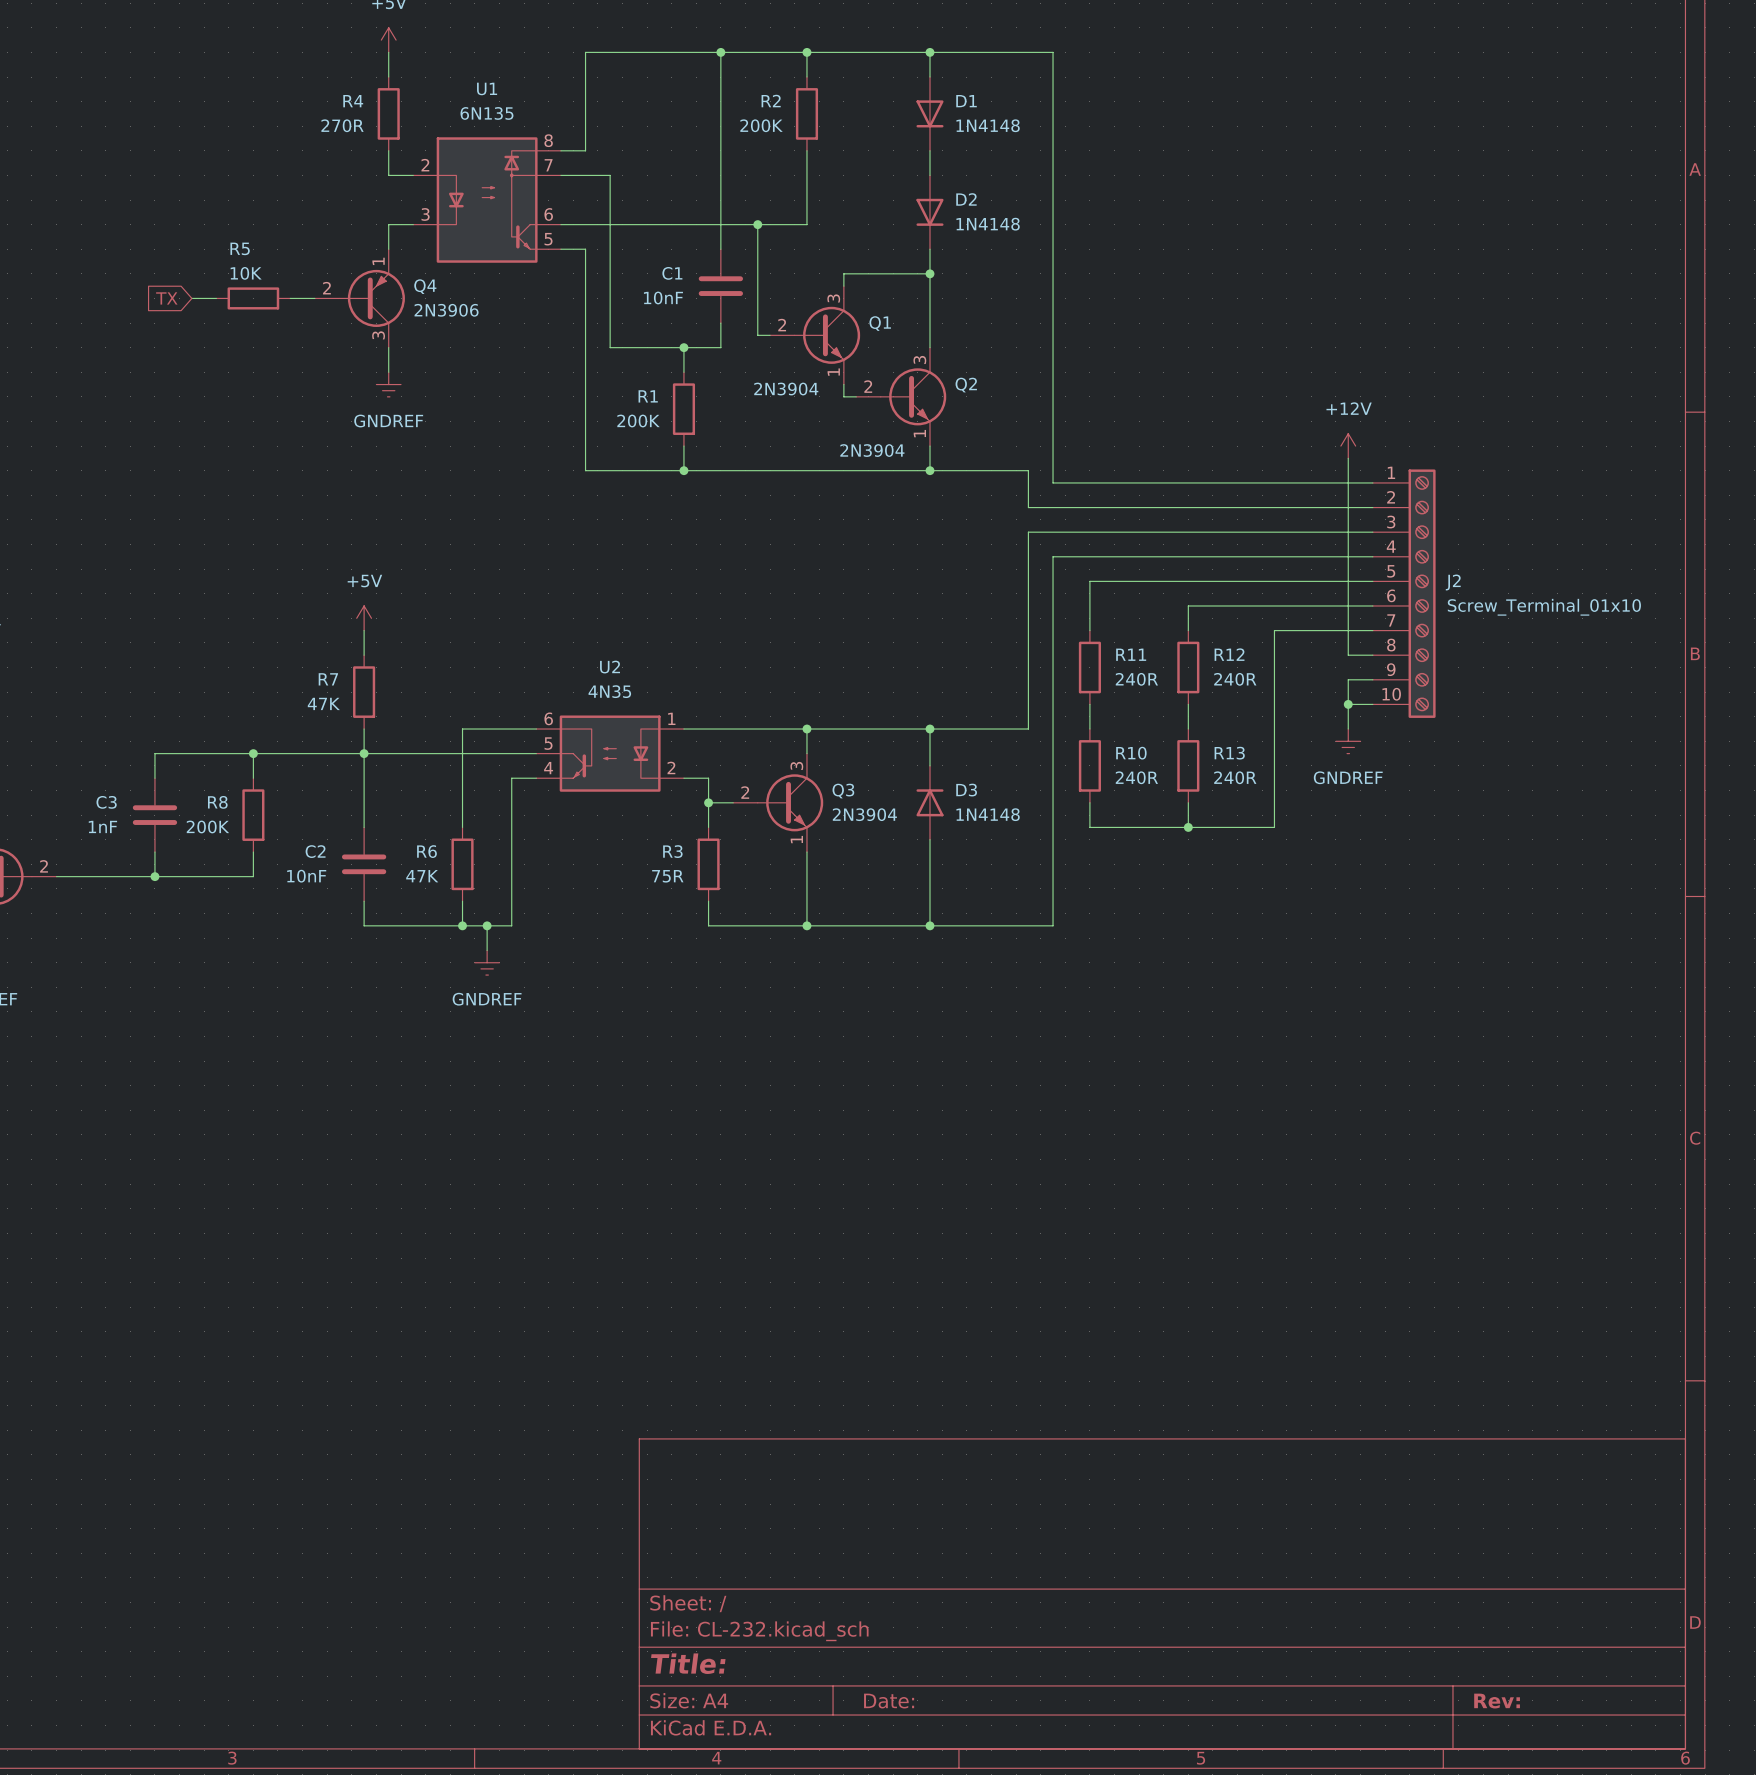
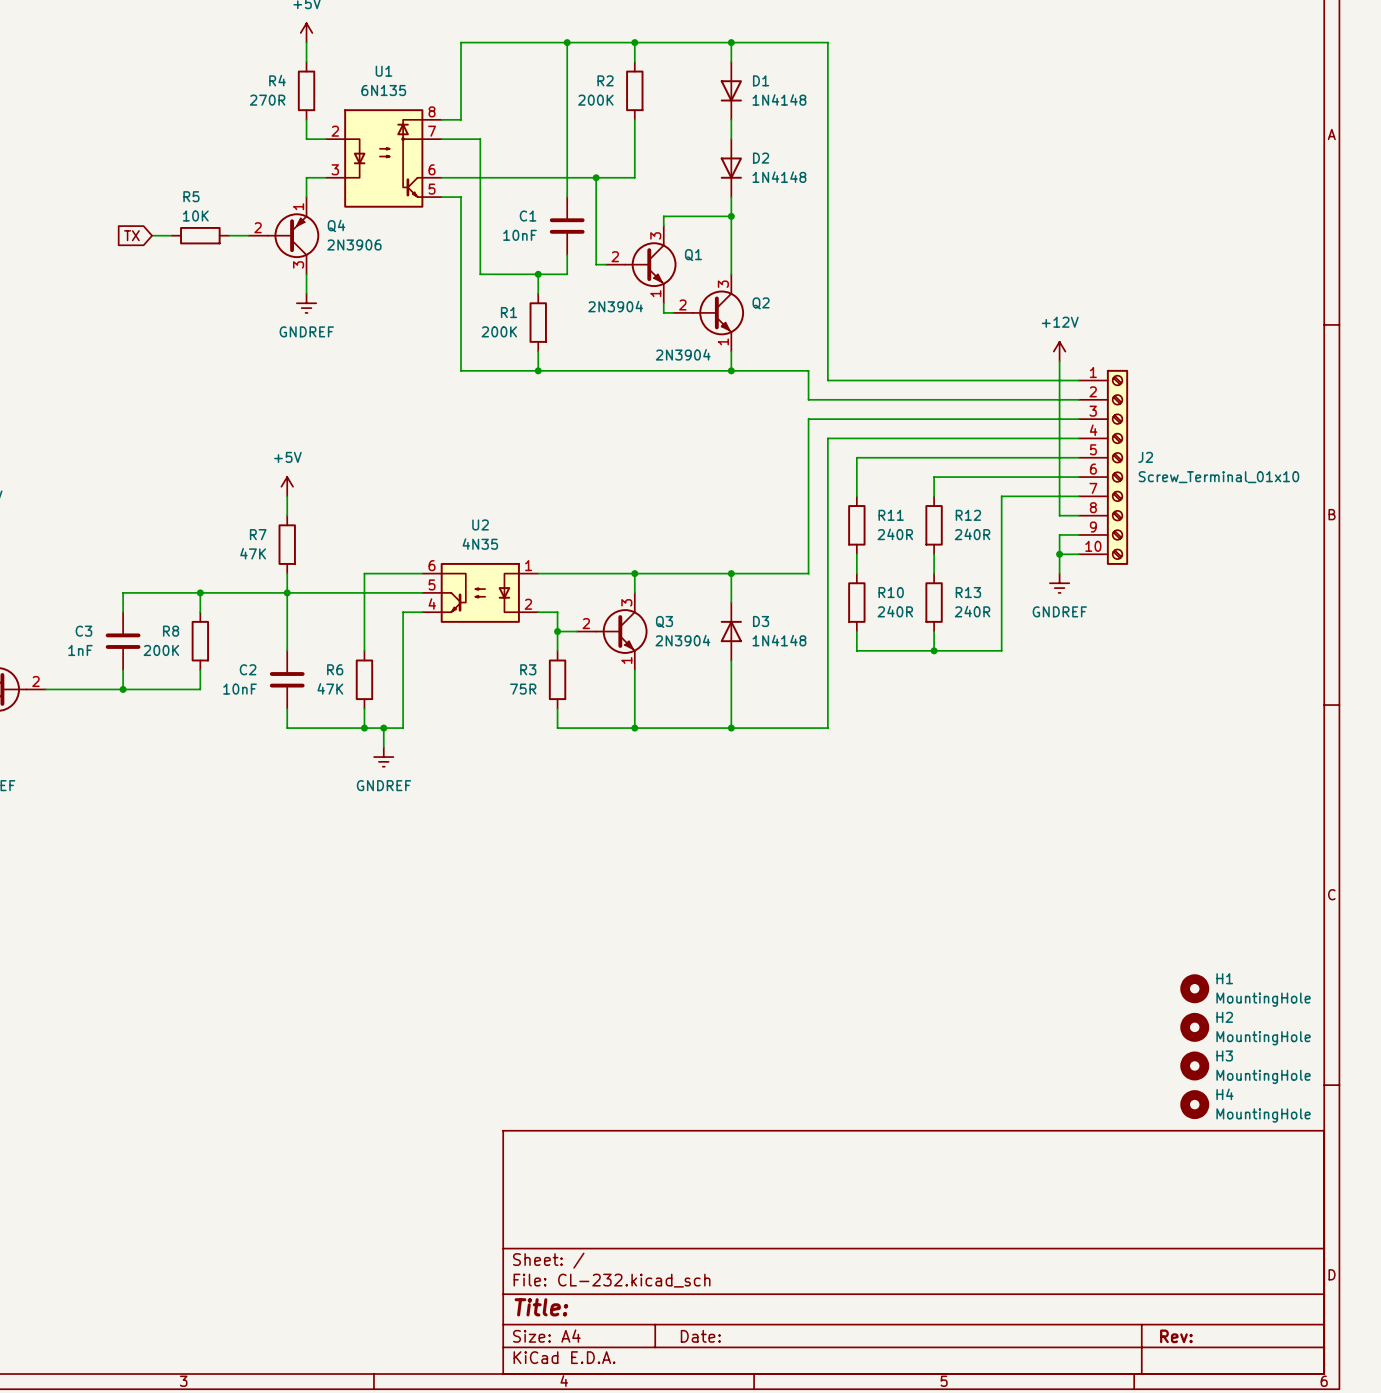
H1: none -> MountingHole (1194, 988)
H2: none -> MountingHole (1194, 1027)
H3: none -> MountingHole (1194, 1065)
H4: none -> MountingHole (1194, 1104)

